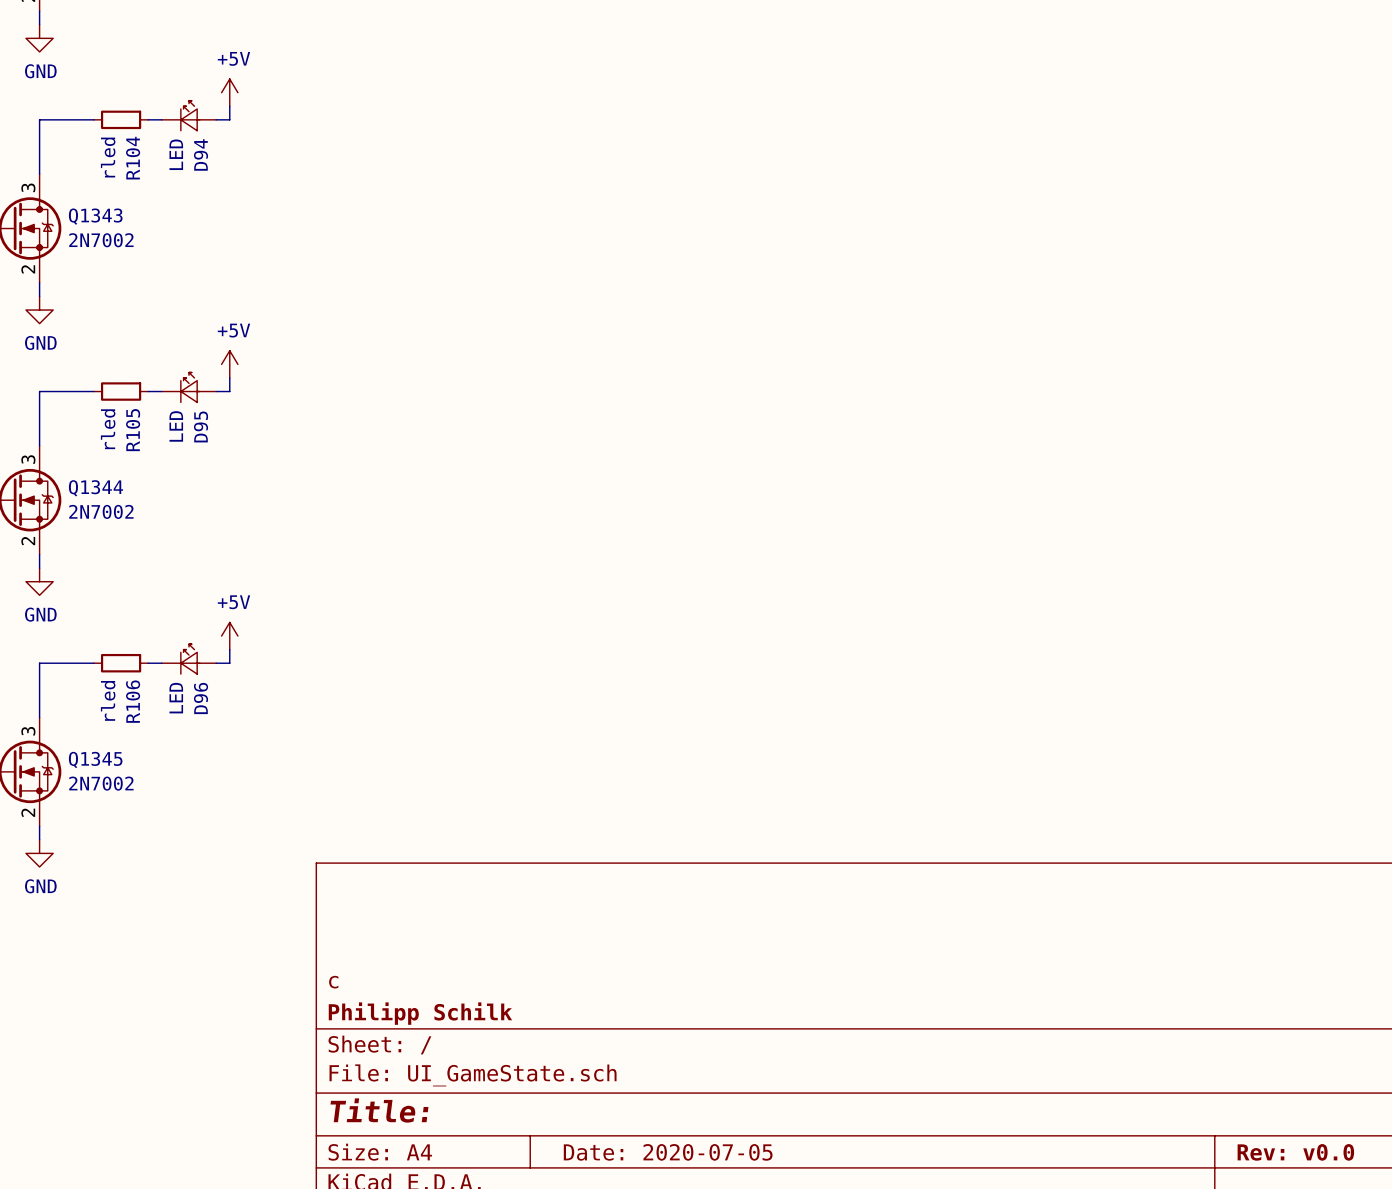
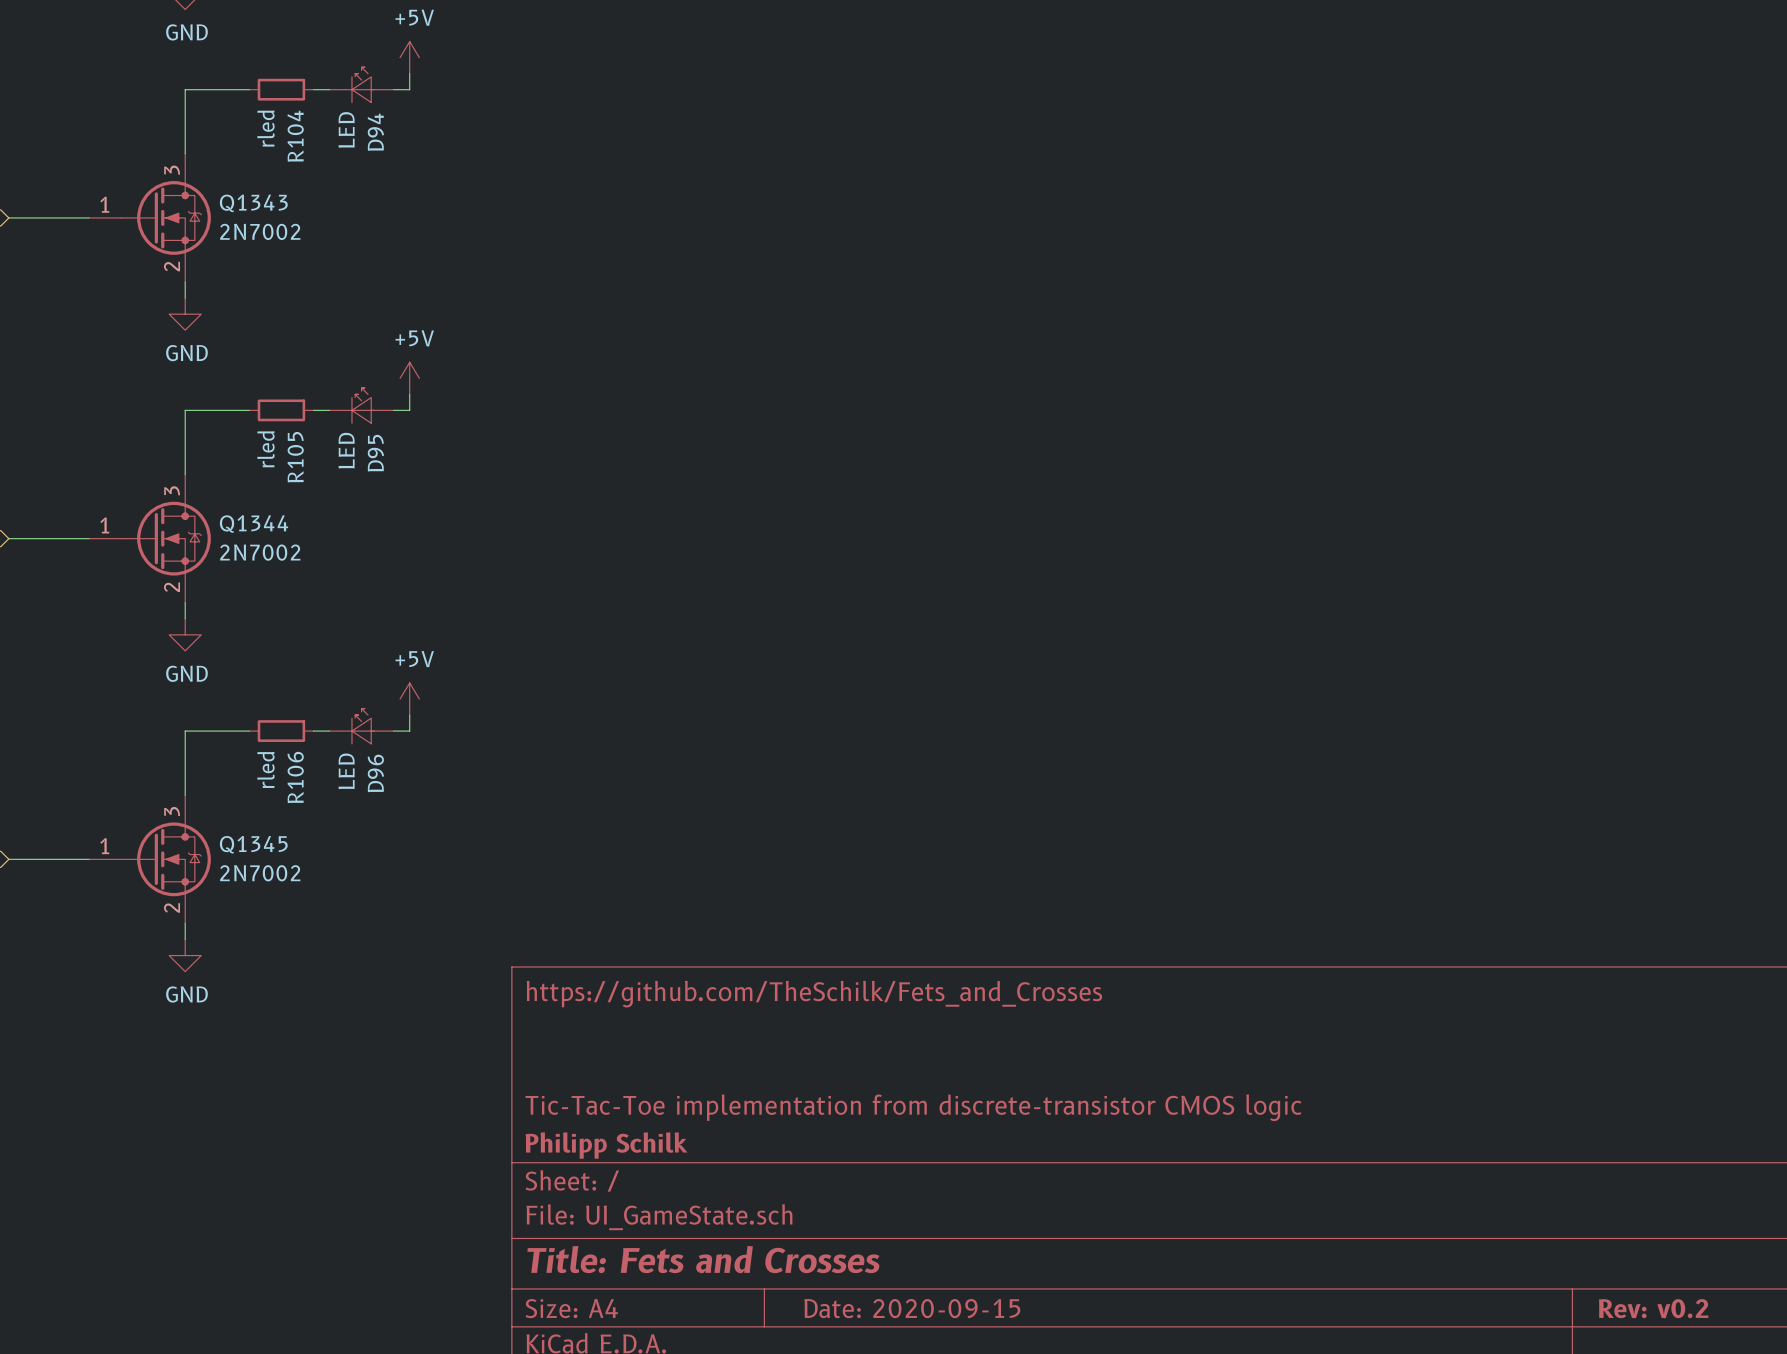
title block: none -> https://github.com/TheSchilk/Fets_and_Crosses (814, 994)
title block: c (333, 982) -> Tic-Tac-Toe implementation from discrete-transistor CMOS logic (913, 1107)
title block: Title: (379, 1110) -> Title: Fets and Crosses (703, 1259)
title block: Date: 2020-07-05 (668, 1152) -> Date: 2020-09-15 (912, 1308)
title block: Rev: v0.0 (1295, 1152) -> Rev: v0.2 (1653, 1308)

